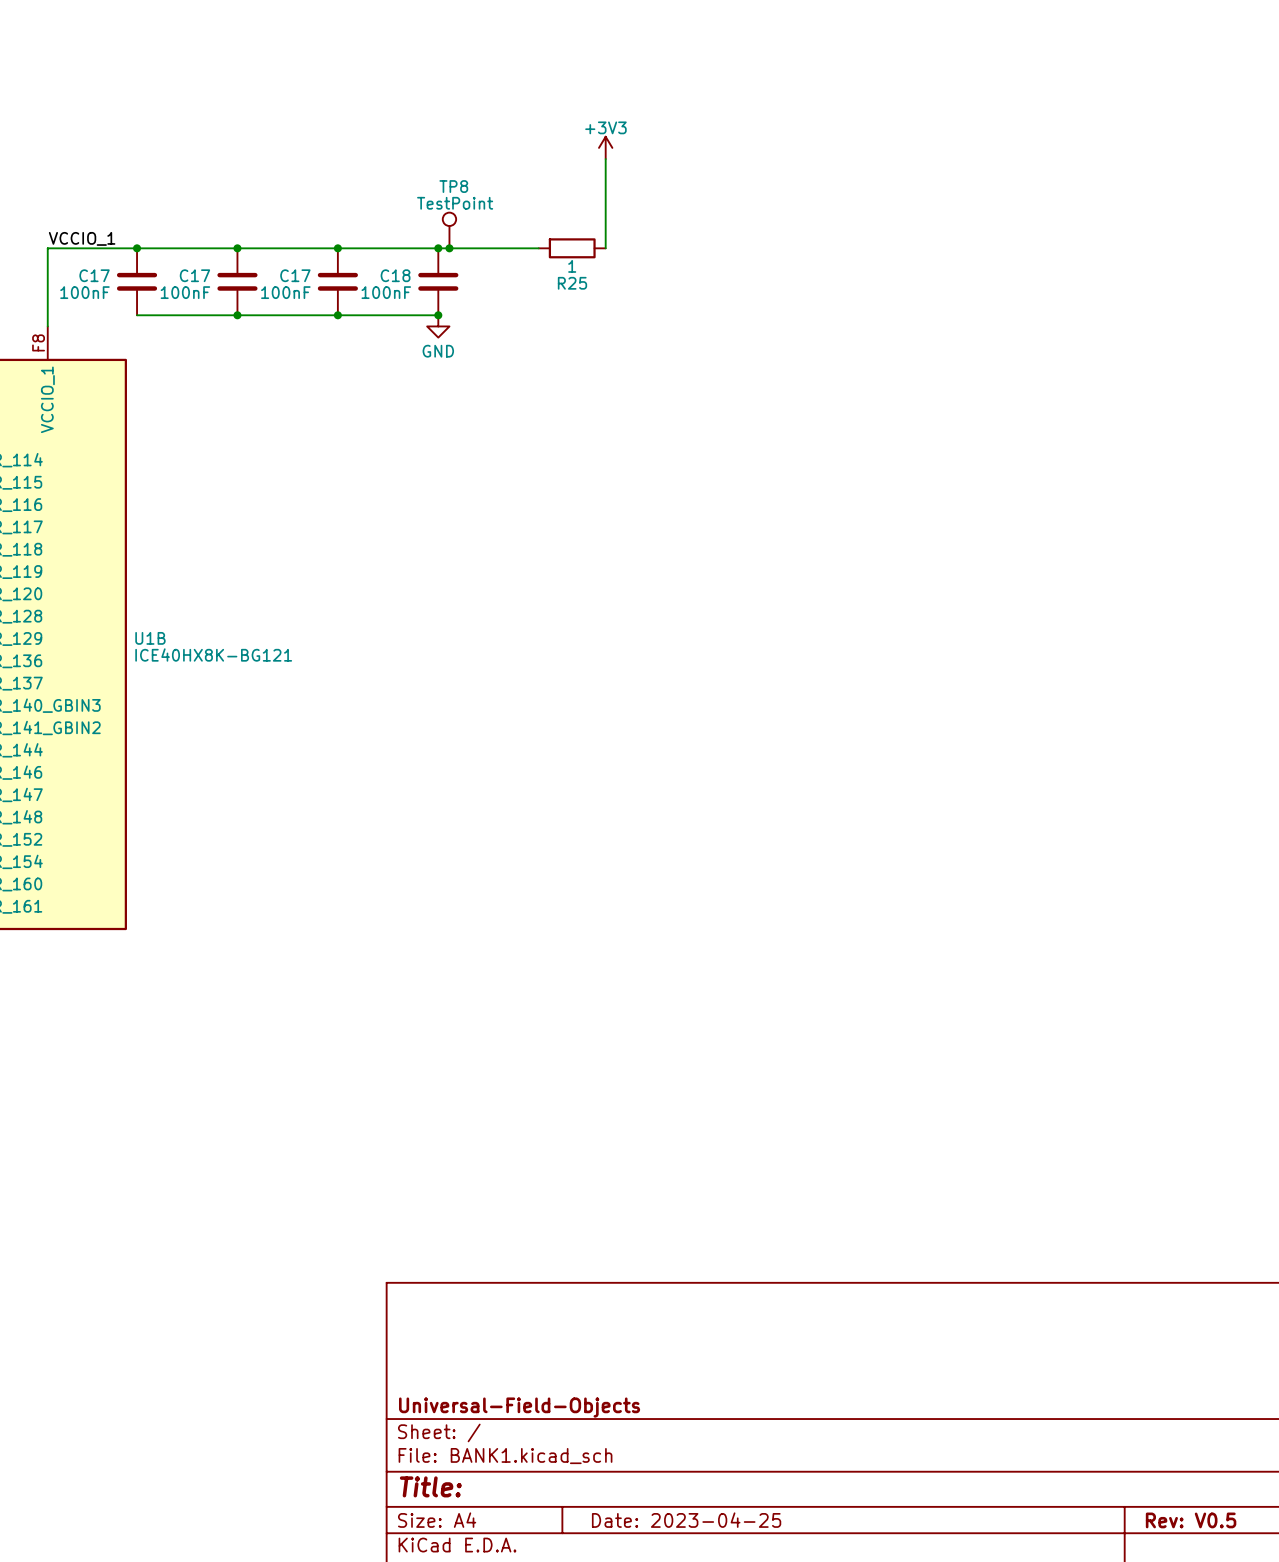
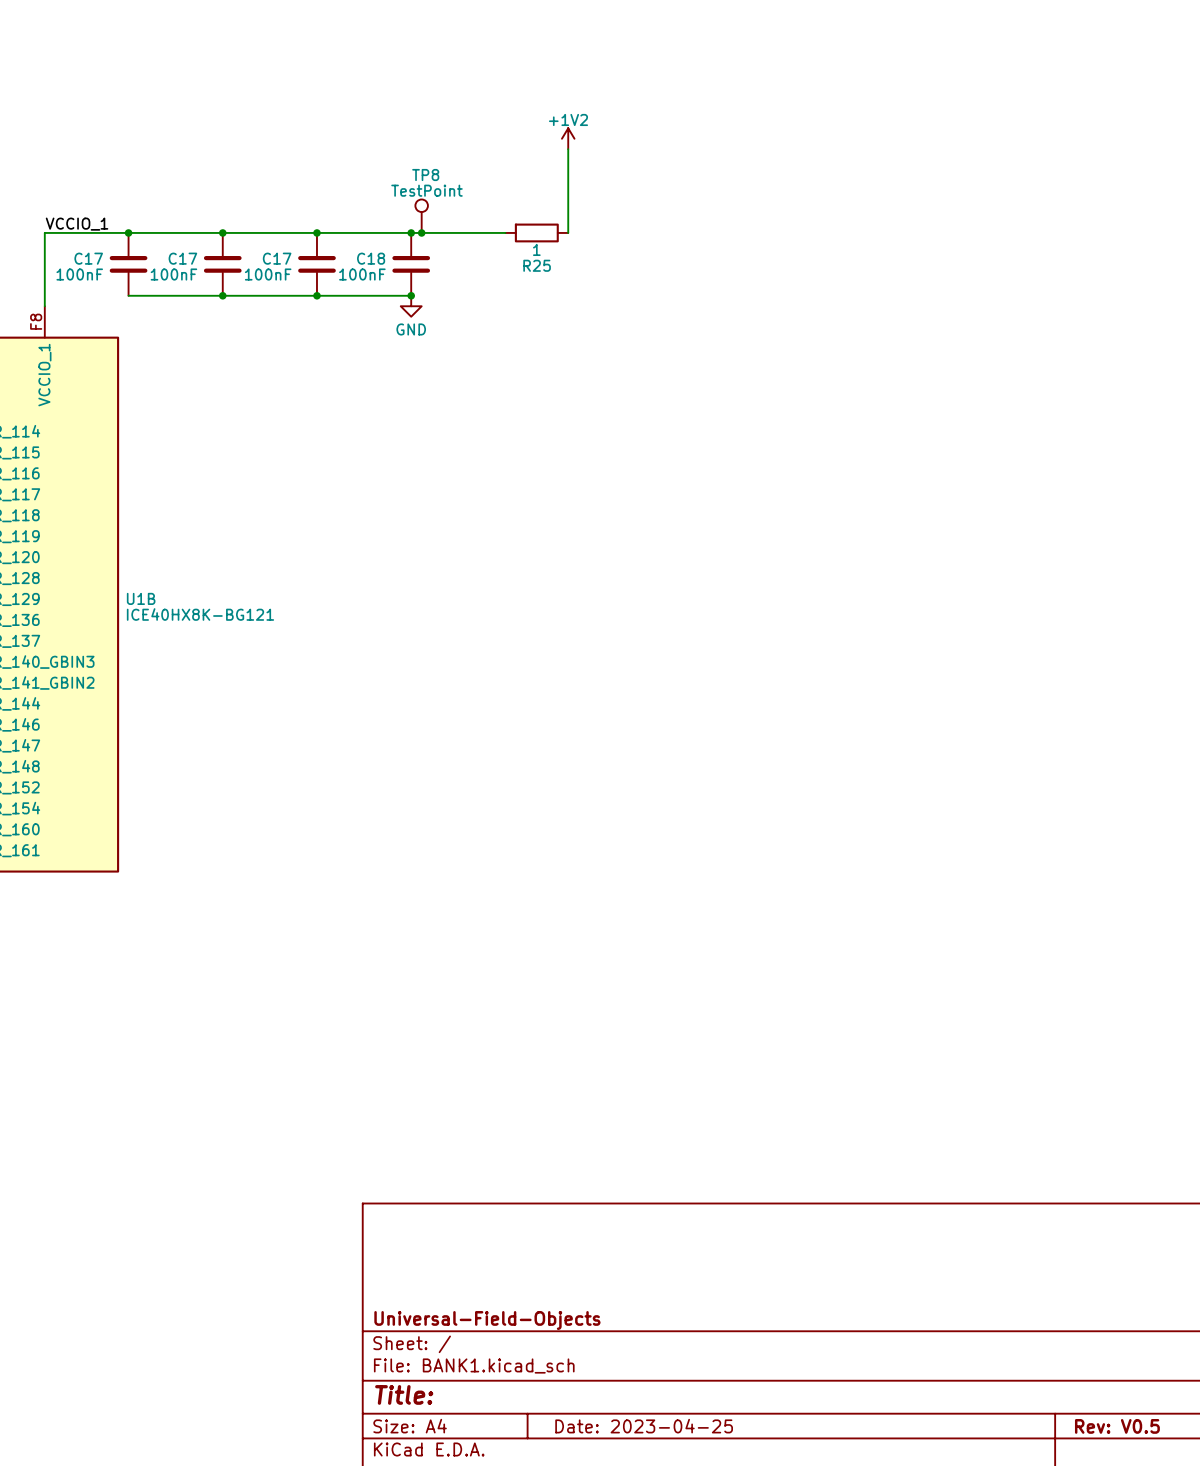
power symbol: +3V3 (605, 147) -> +1V2 (568, 138)

